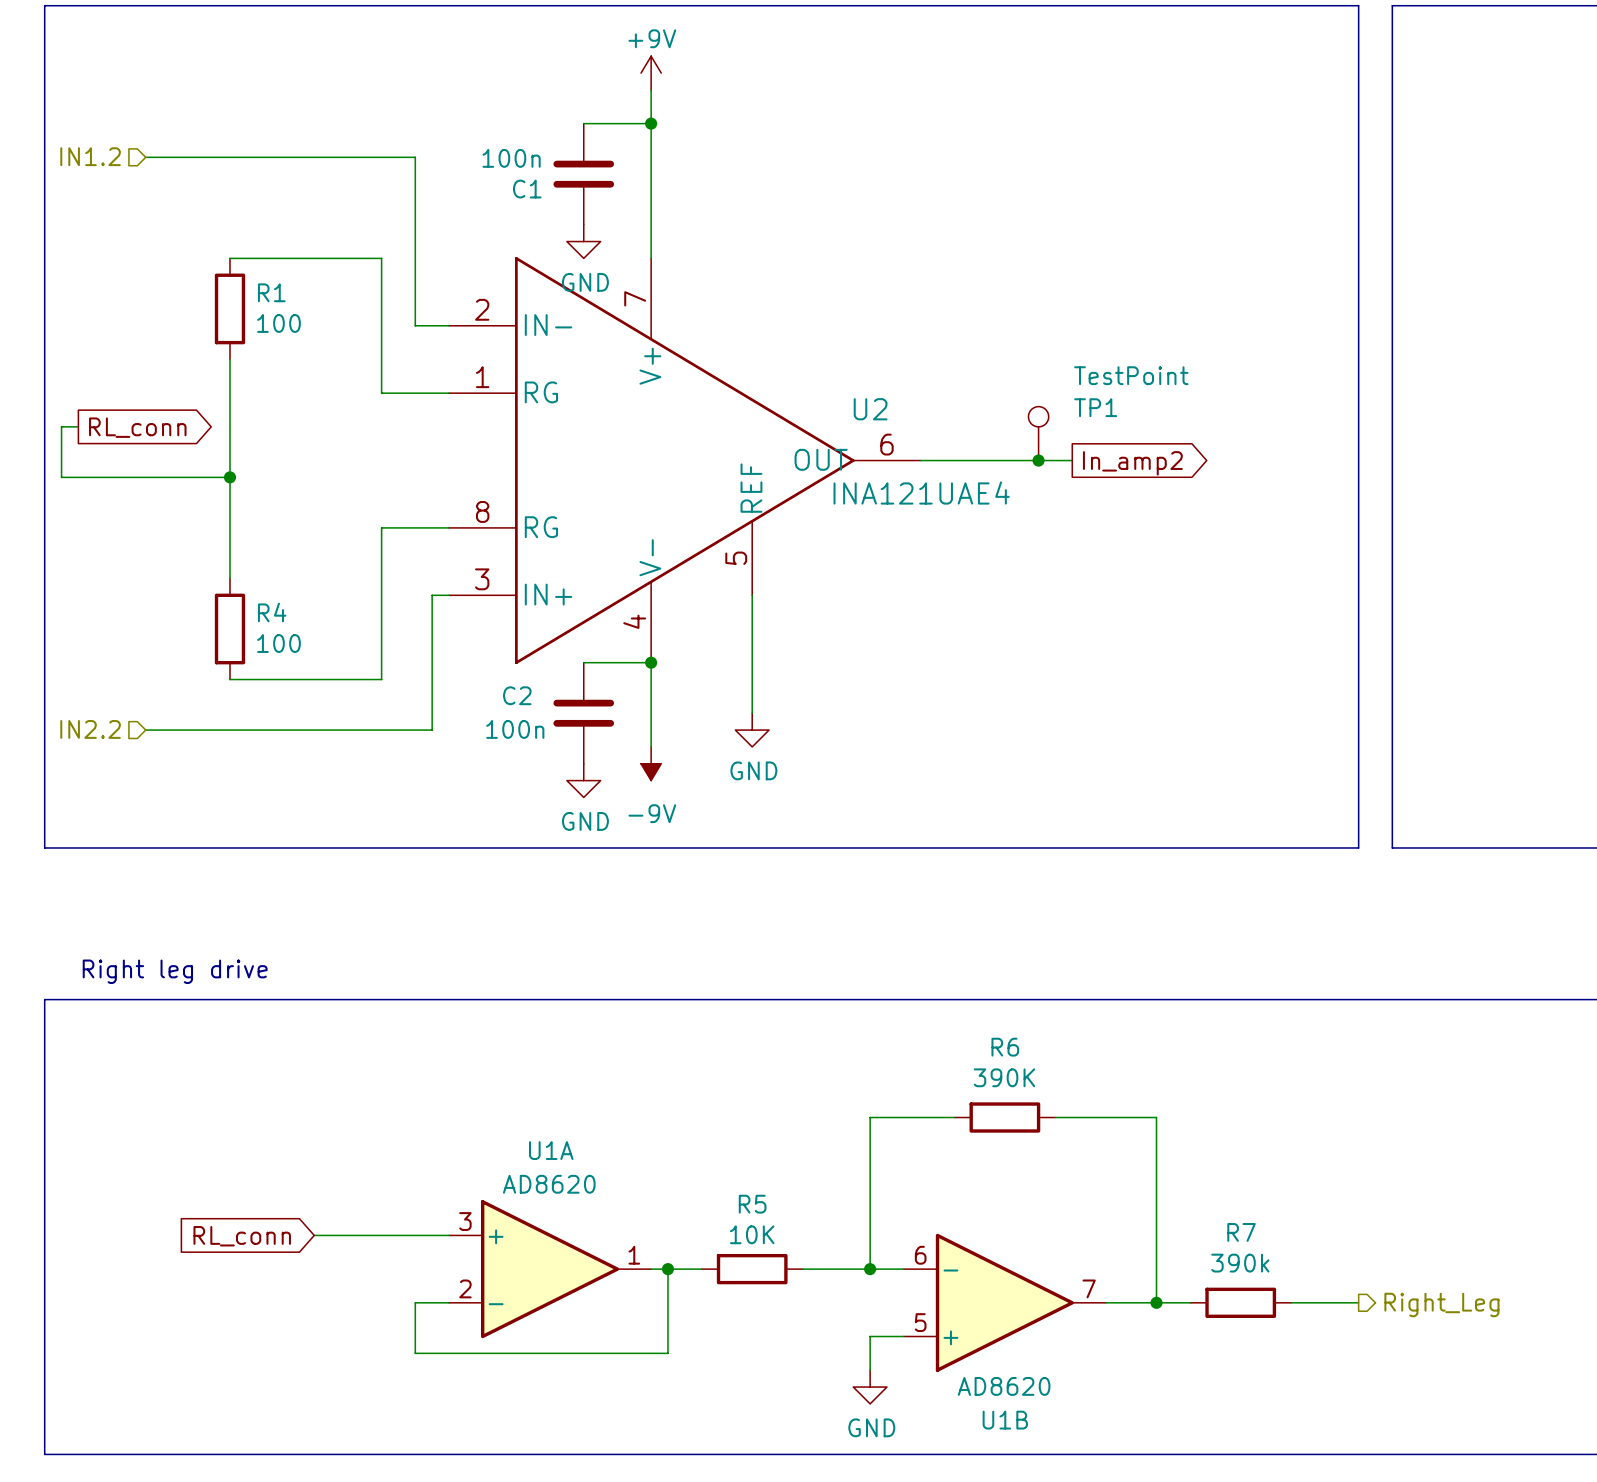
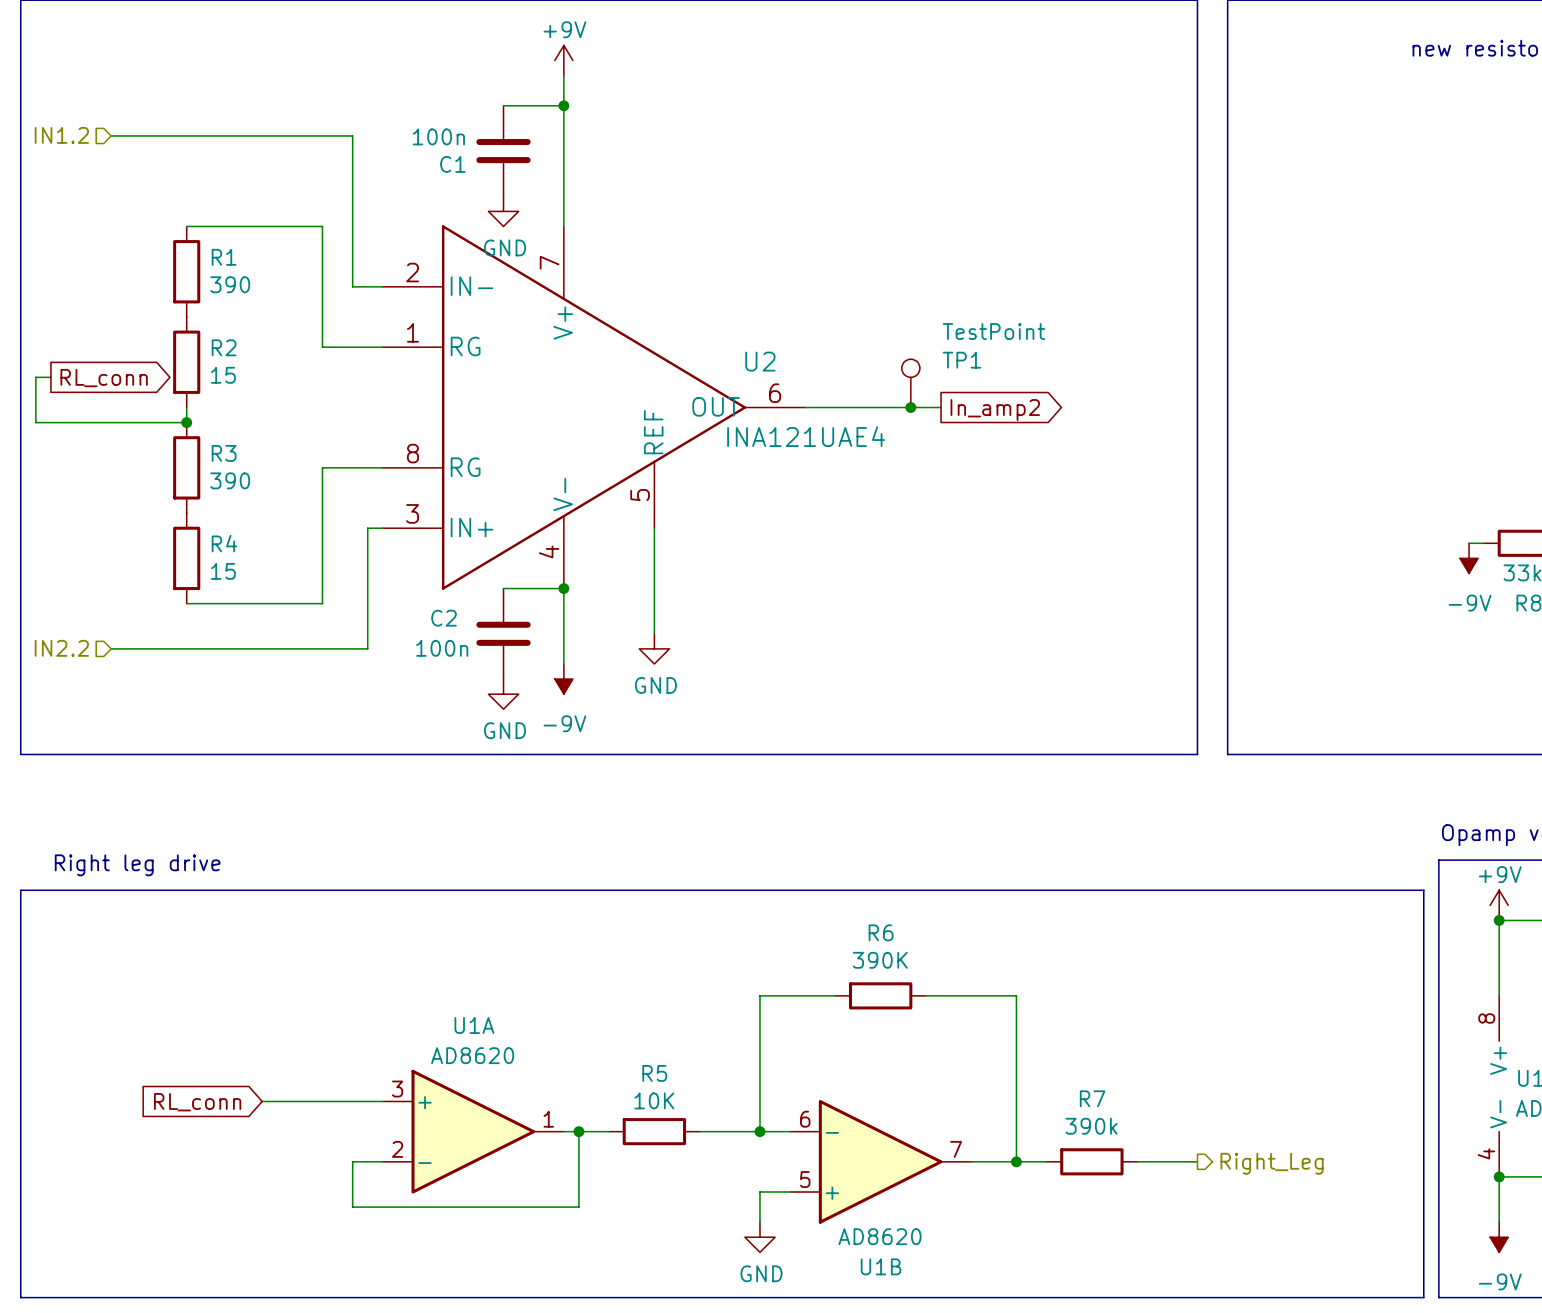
R1 value: 100 (278, 323) -> 390 (230, 284)
wire: (229, 359) (229, 460) -> none
R2: none -> 15 (186, 362)
wire: (229, 477) (229, 578) -> none
R3: none -> 390 (186, 467)
R4 value: 100 (278, 643) -> 15 (223, 571)

